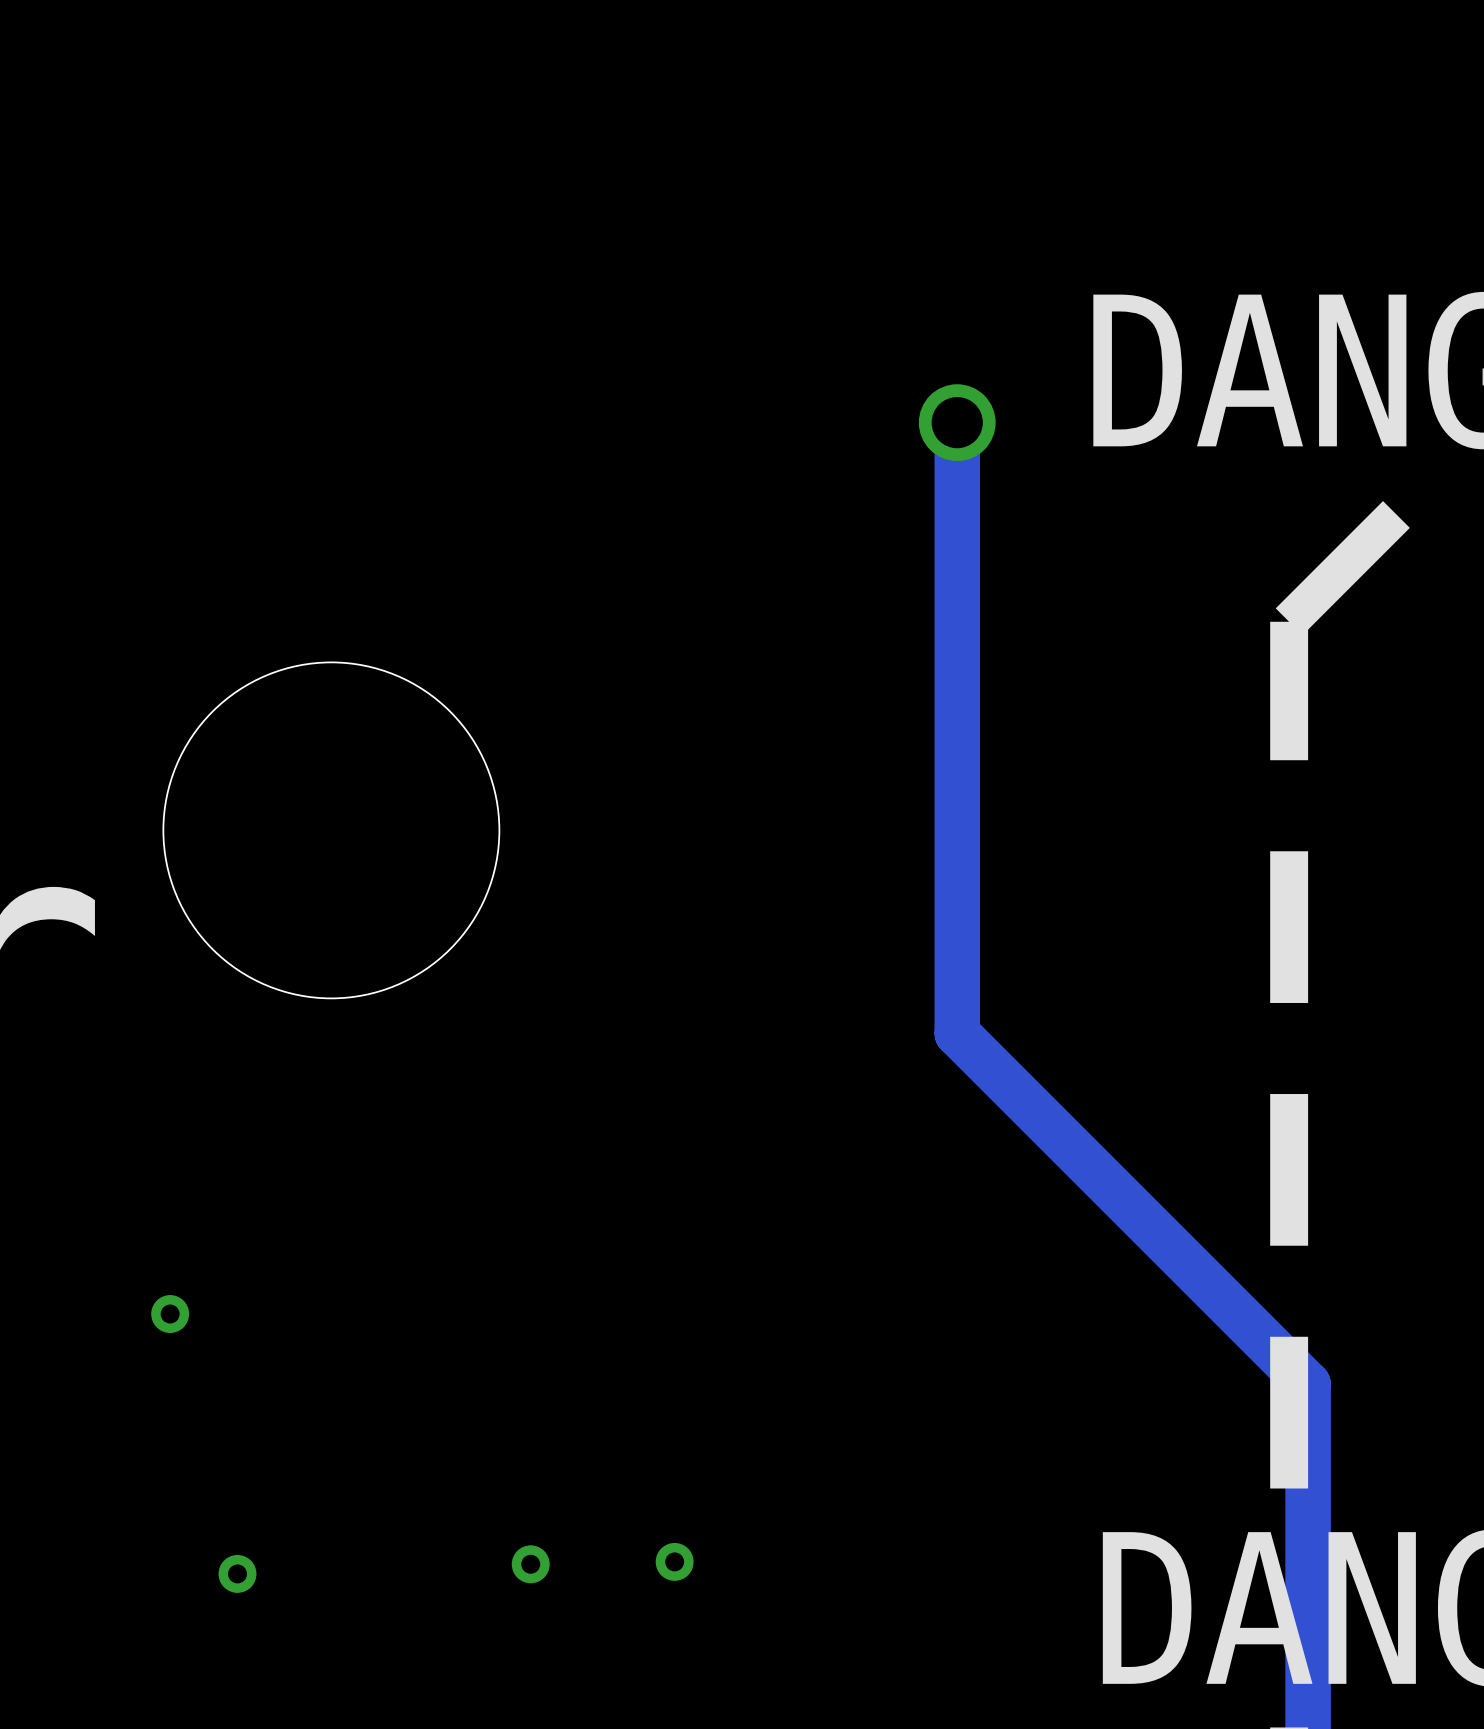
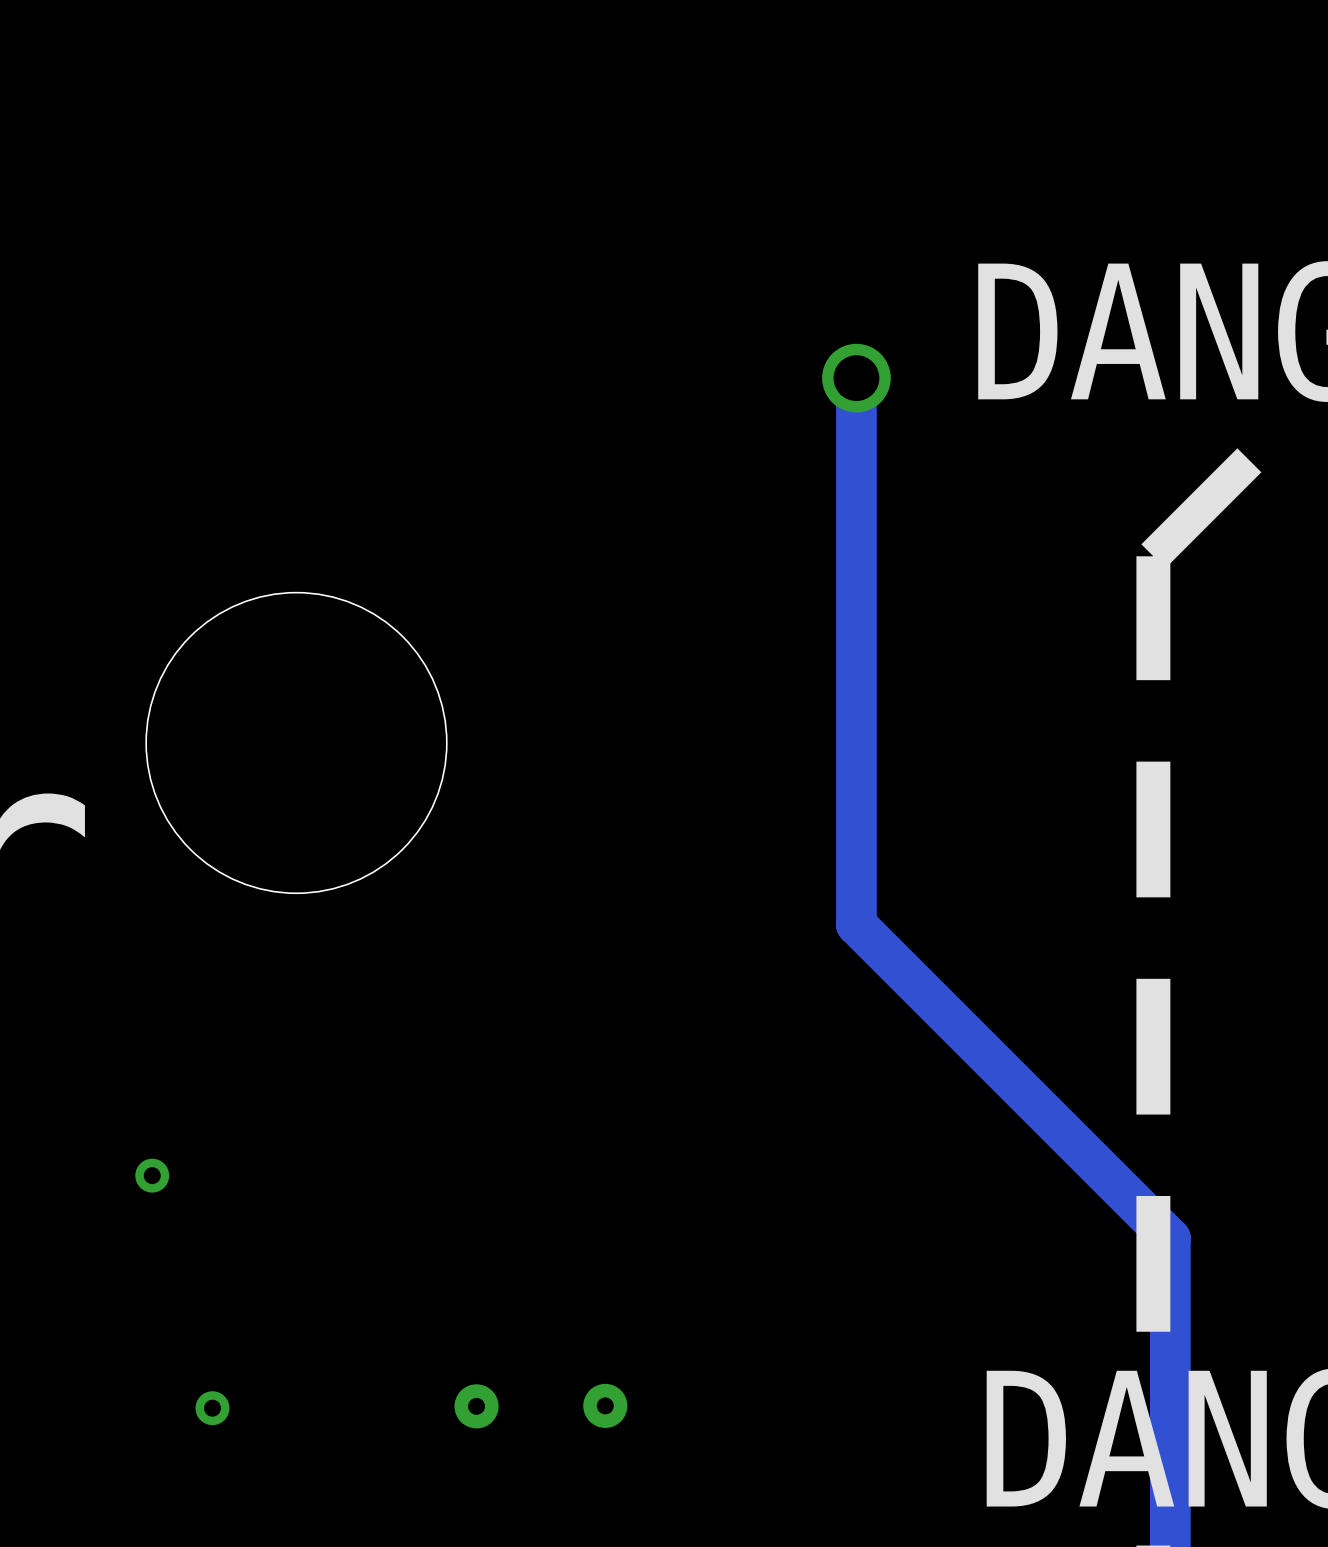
via size: [655, 1542, 694, 1581] -> [583, 1383, 628, 1428]
via size: [511, 1545, 550, 1584] -> [454, 1384, 499, 1429]

